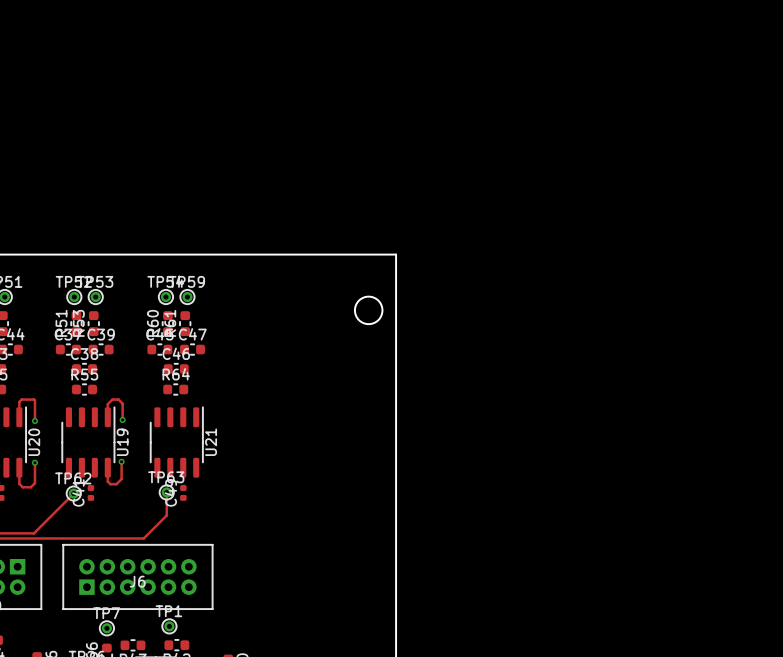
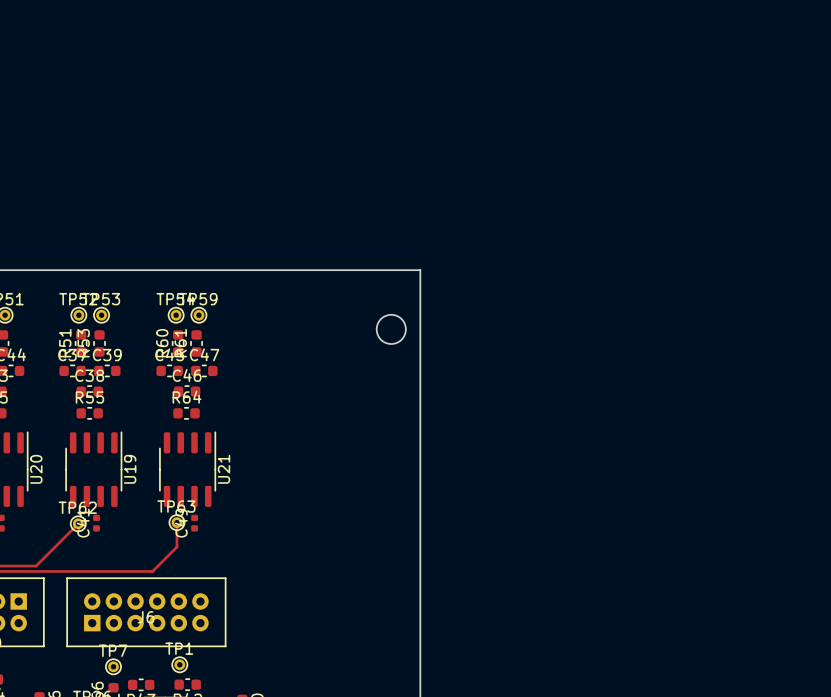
track: (19, 417) (19, 401) (21, 399) (33, 399) (34, 420) -> none
track: (107, 417) (107, 404) (112, 399) (118, 399) (122, 403) (122, 419) -> none
via: (122, 419) -> none
via: (34, 420) -> none
track: (121, 461) (121, 479) (116, 484) (110, 484) (107, 481) (107, 467) -> none
via: (121, 461) -> none
track: (34, 462) (34, 483) (30, 487) (22, 487) (19, 483) (19, 467) -> none
via: (34, 462) -> none

